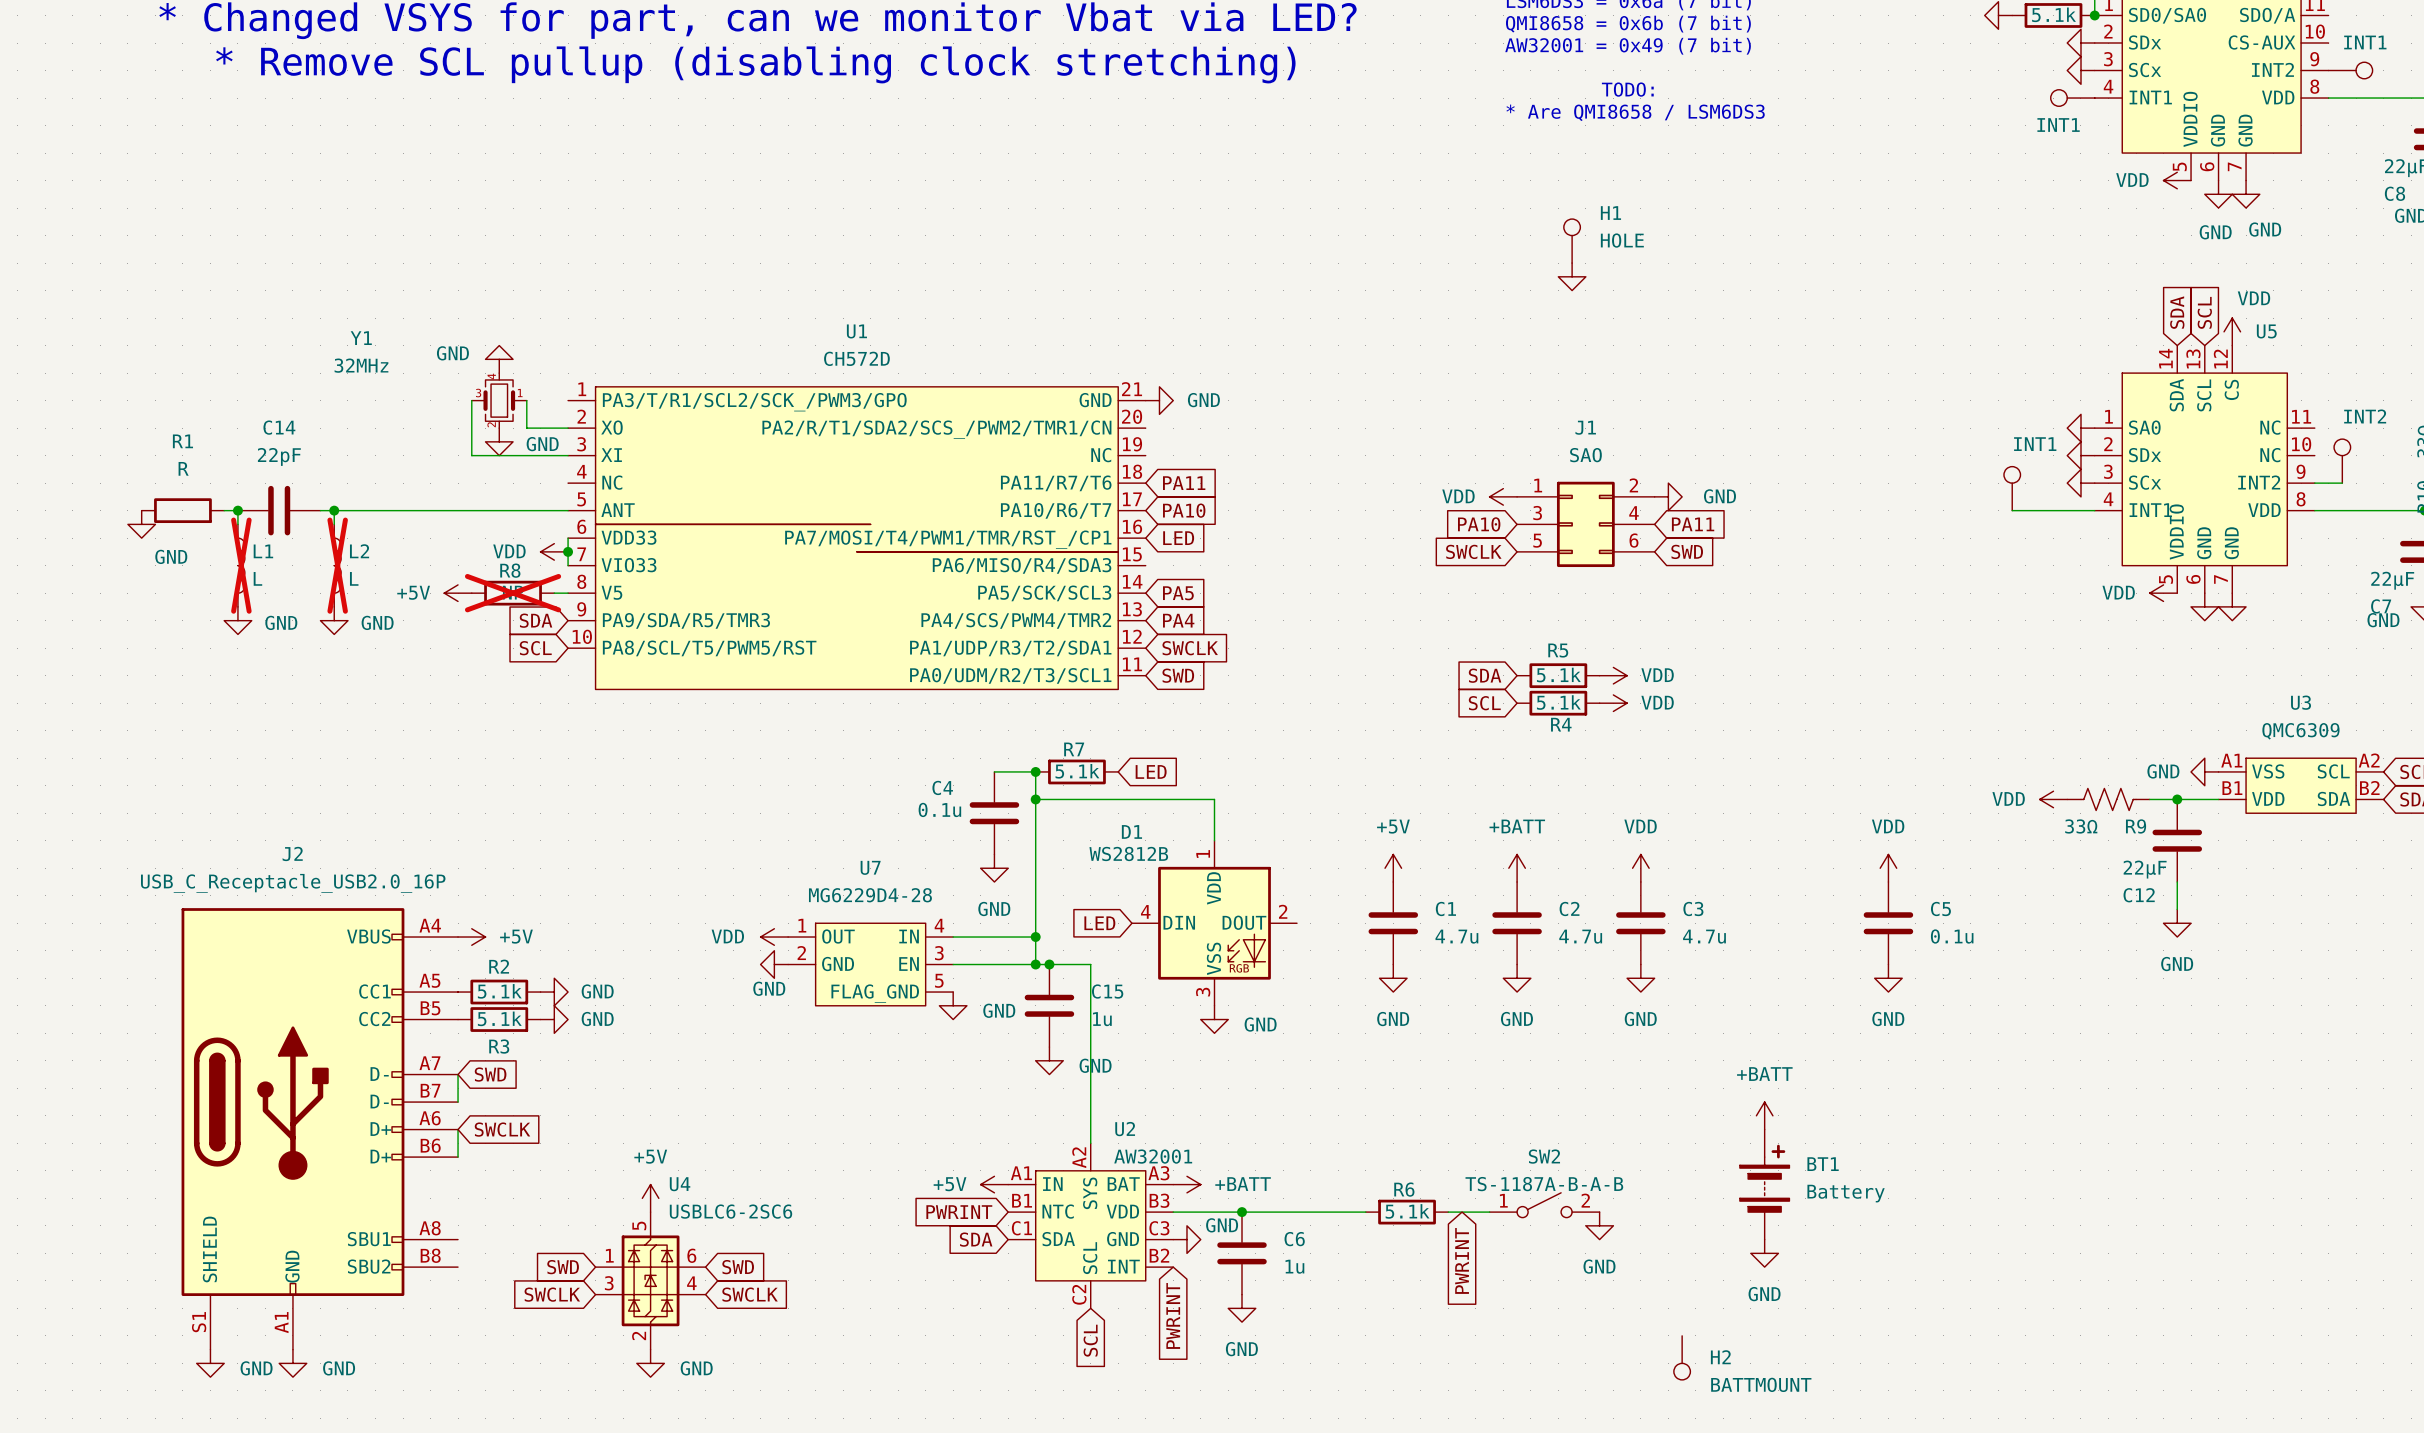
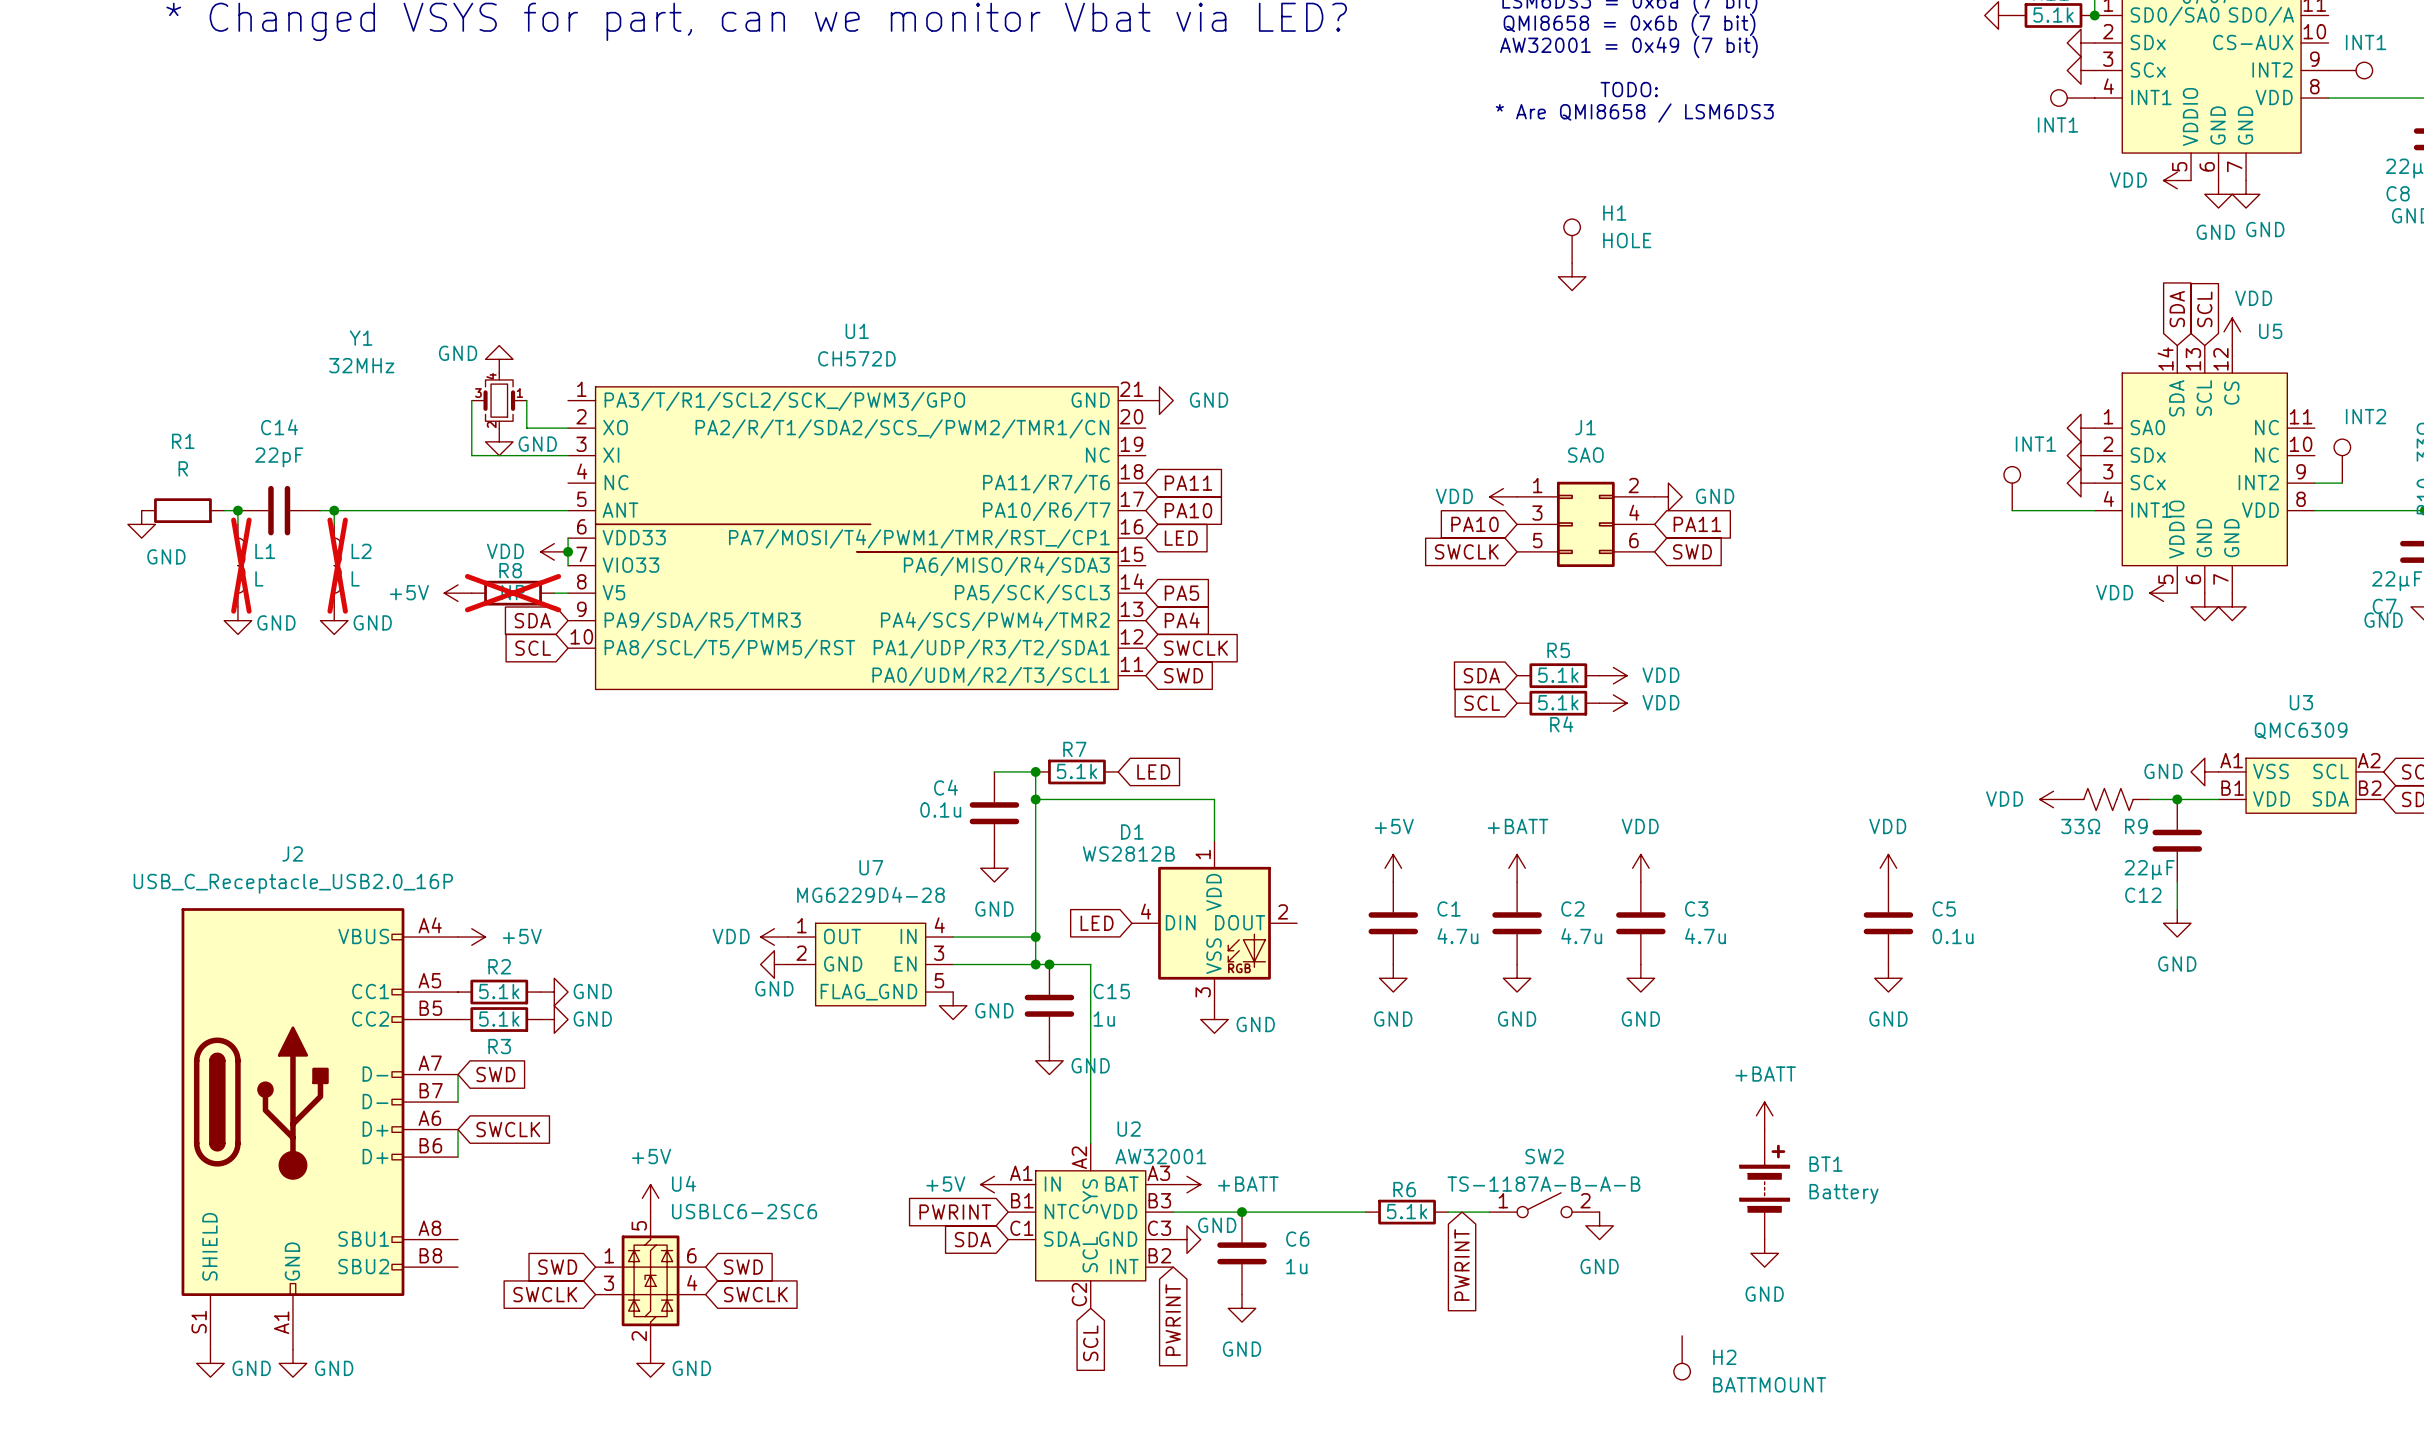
text: * Remove SCL pullup (disabling clock stretching) (755, 64) -> none

